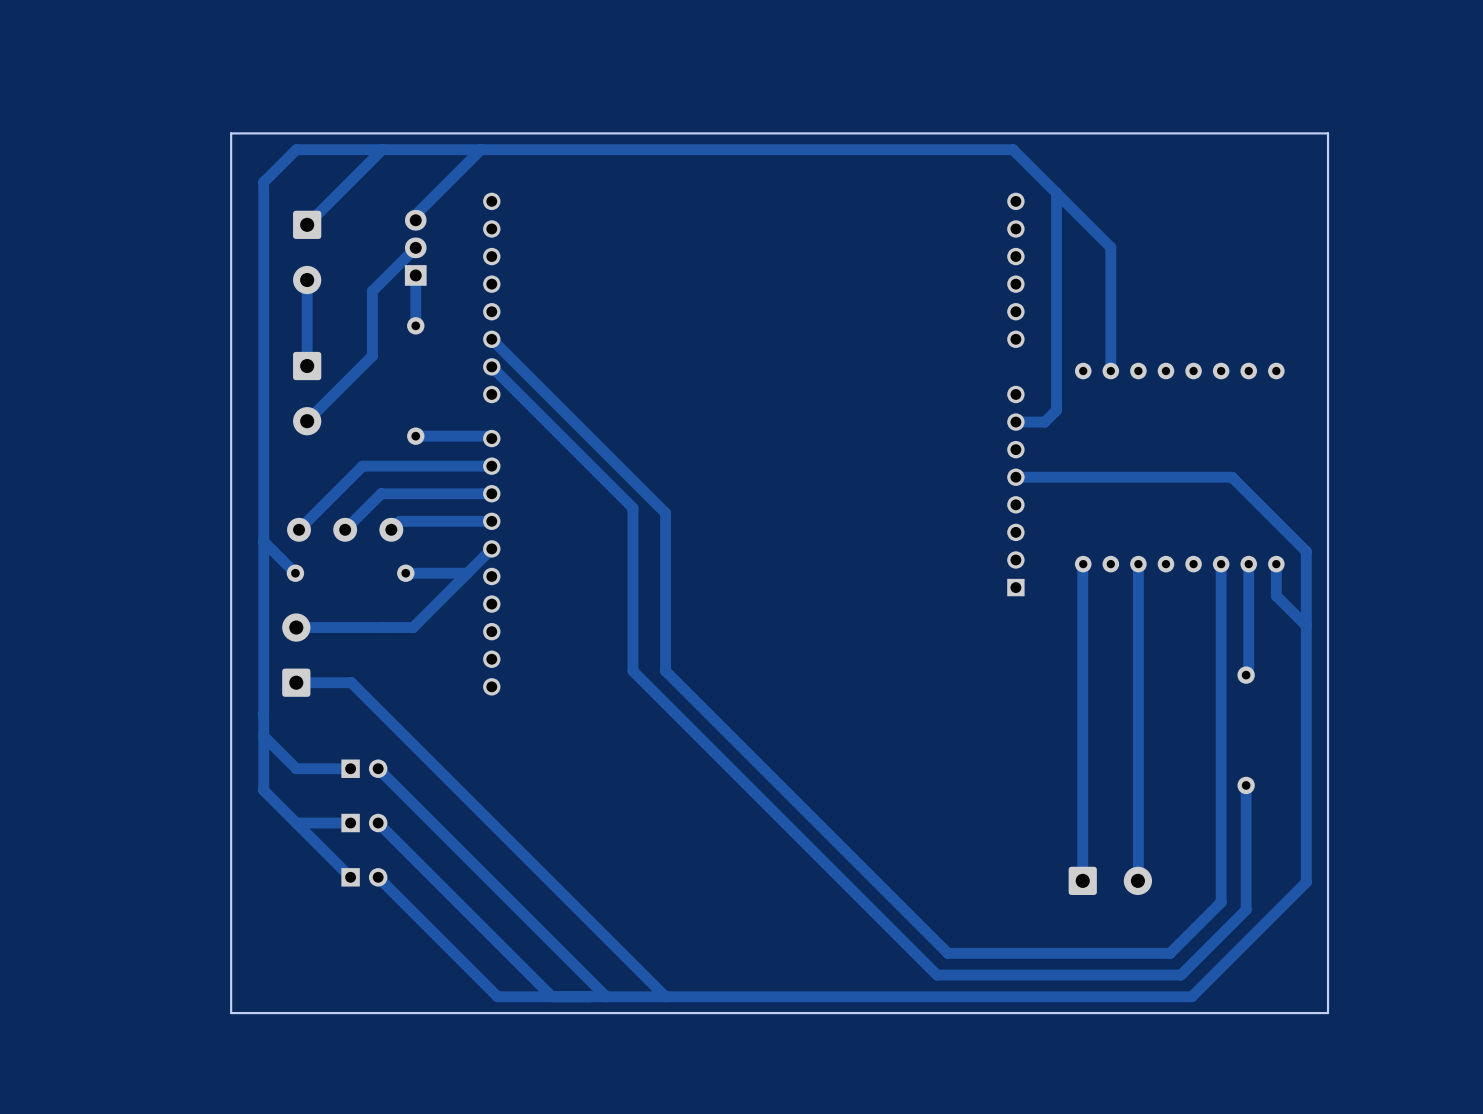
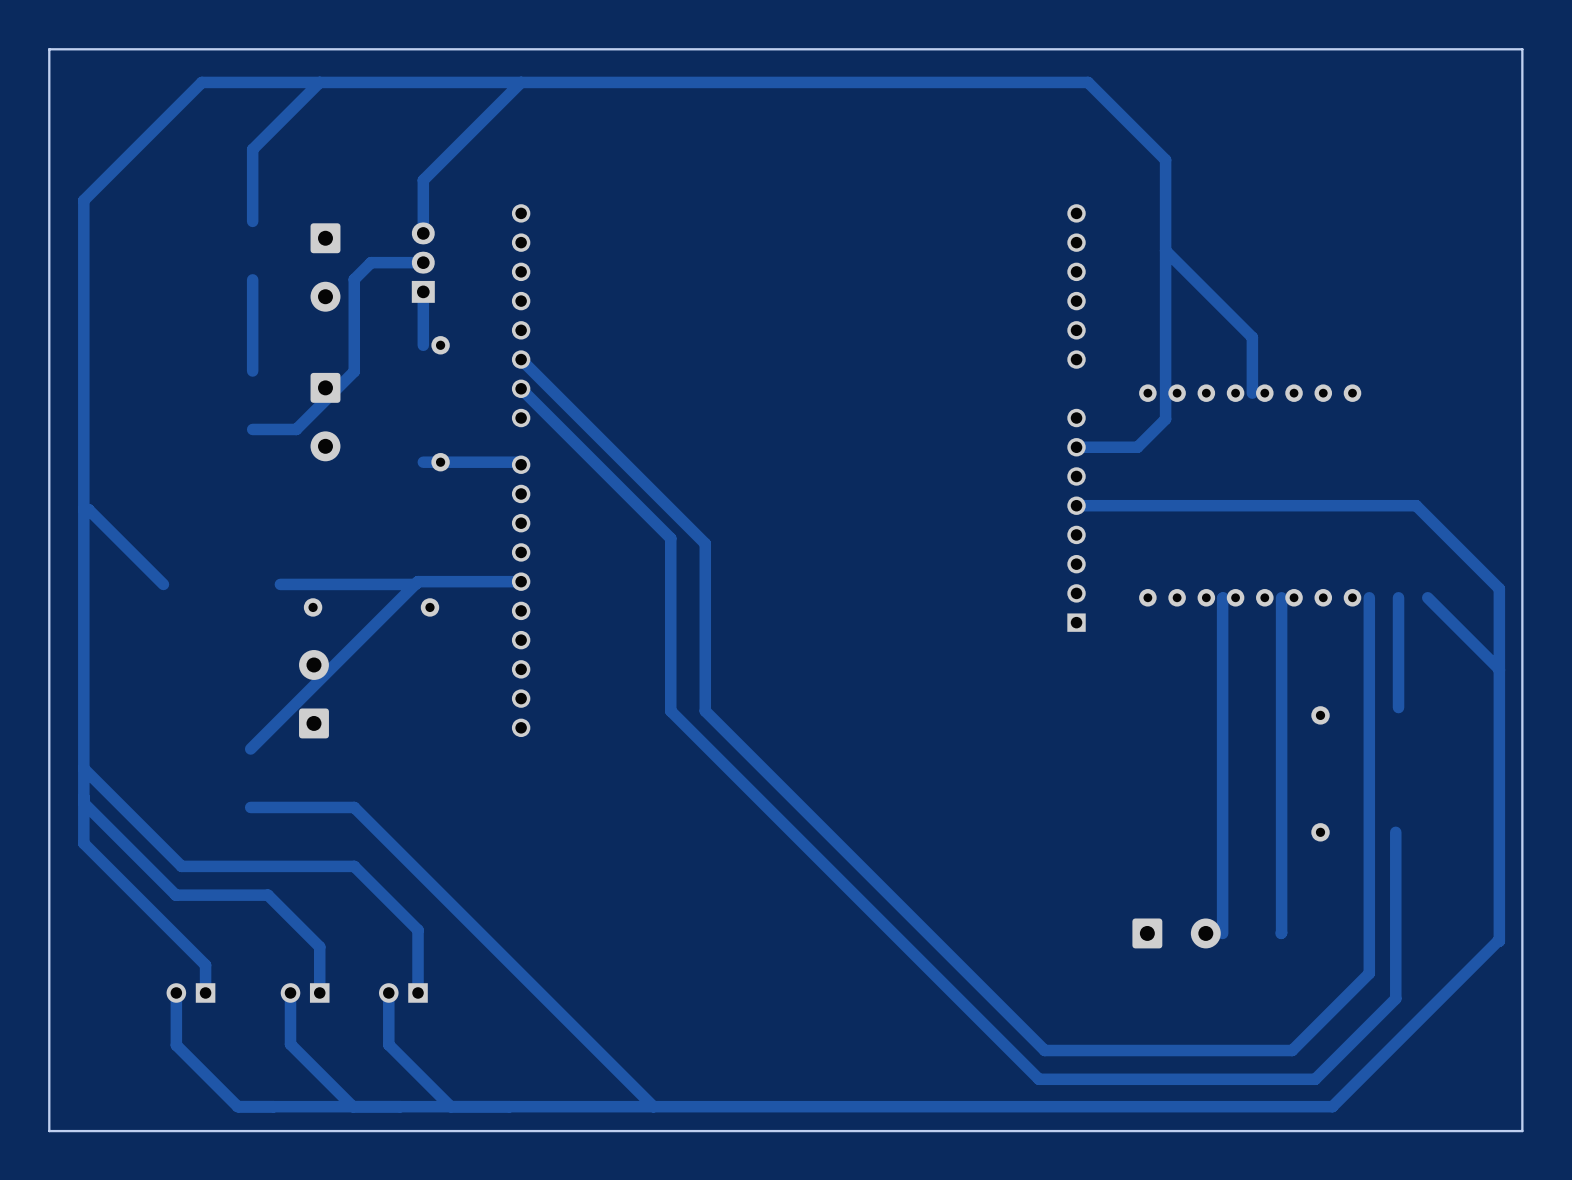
track: none -> (319, 82) (252, 149) (252, 221)
track: none -> (521, 82) (423, 180) (423, 233)
board edge: (1328, 133) (231, 133) (231, 1013) (1328, 1013) (1328, 133) -> (1522, 49) (1522, 1131) (49, 1131) (49, 49) (1522, 49)
track: (382, 149) (308, 224) -> none
track: (480, 149) (415, 214) (415, 220) -> none
track: (1056, 193) (1056, 410) (1044, 422) -> (205, 992) (205, 965) (83, 843) (83, 200) (201, 82) (1088, 82) (1165, 160) (1165, 419) (1137, 447) (1107, 447)
track: (1099, 236) (1013, 149) (296, 149) (263, 182) (263, 790) (350, 877) -> none
track: none -> (423, 262) (371, 262) (354, 279) (354, 371) (296, 429) (252, 429)
track: (415, 247) (372, 291) (372, 356) (307, 421) -> none
part position: (415, 247) -> (423, 262)
track: (1110, 247) (1110, 371) -> (1177, 262) (1252, 337) (1252, 393)
track: (415, 275) (415, 325) -> (423, 291) (423, 345)
track: (307, 280) (307, 366) -> (252, 279) (252, 371)
track: none -> (440, 462) (423, 462)
track: (491, 466) (362, 466) (299, 529) -> none
track: (1232, 477) (1306, 551) (1306, 882) (1191, 996) (497, 996) (378, 877) -> (1305, 505) (1416, 505) (1499, 588) (1499, 941) (1332, 1106) (237, 1106) (176, 1045) (176, 992)
track: none -> (83, 509) (88, 509) (163, 584)
track: (491, 493) (381, 493) (345, 529) -> none
track: (491, 521) (399, 521) (391, 529) -> none
part: (299, 529) -> none
part: (345, 529) -> none
part: (391, 529) -> none
track: (263, 541) (295, 573) -> none
track: (491, 548) (413, 627) (296, 627) -> (521, 581) (418, 581) (250, 749)
track: none -> (415, 584) (280, 584)
track: (1083, 564) (1082, 880) -> (1223, 597) (1222, 933)
track: (1138, 564) (1137, 880) -> (1281, 597) (1281, 933)
track: (1221, 564) (1221, 902) (1170, 953) (947, 953) -> (1369, 597) (1369, 973) (1292, 1050) (1044, 1050) (1004, 1010)
track: (1248, 564) (1248, 667) -> (1398, 597) (1398, 707)
track: (1276, 564) (1276, 595) (1306, 625) -> none
track: none -> (1427, 597) (1499, 669)
track: (467, 573) (405, 573) -> none
track: (296, 682) (351, 682) (665, 996) -> none
track: none -> (83, 768) (181, 866) (354, 866) (418, 930) (418, 992)
track: (263, 736) (296, 768) (350, 768) -> none
track: none -> (83, 803) (175, 895) (267, 895) (319, 946) (319, 992)
track: none -> (250, 807) (354, 807) (653, 1106)
part: (364, 768) -> none
track: (378, 768) (606, 996) -> none
track: (1246, 785) (1246, 909) (1180, 975) (937, 975) -> (1395, 832) (1395, 998) (1315, 1079) (1039, 1079) (992, 1033)
track: (350, 823) (296, 823) -> none
part: (364, 823) -> none
track: (378, 823) (551, 996) -> none
part: (364, 877) -> none
part: none -> (190, 992)
track: none -> (290, 992) (290, 1044) (352, 1106)
part: none -> (305, 992)
track: none -> (388, 992) (388, 1044) (450, 1106)
part: none -> (403, 992)

